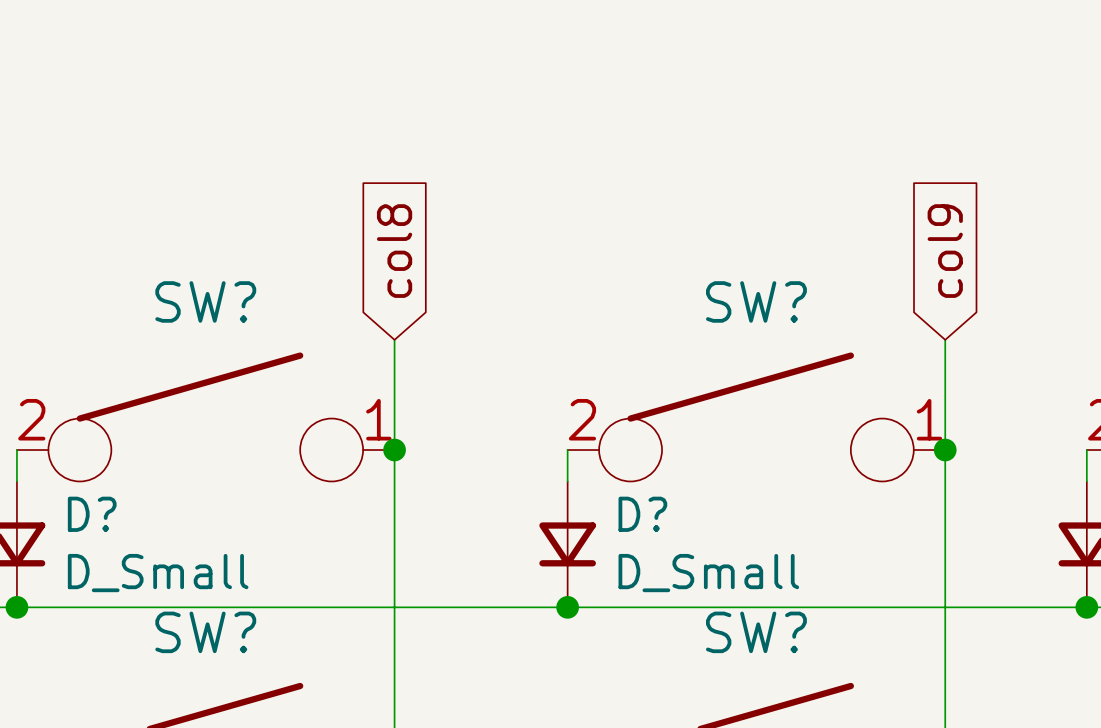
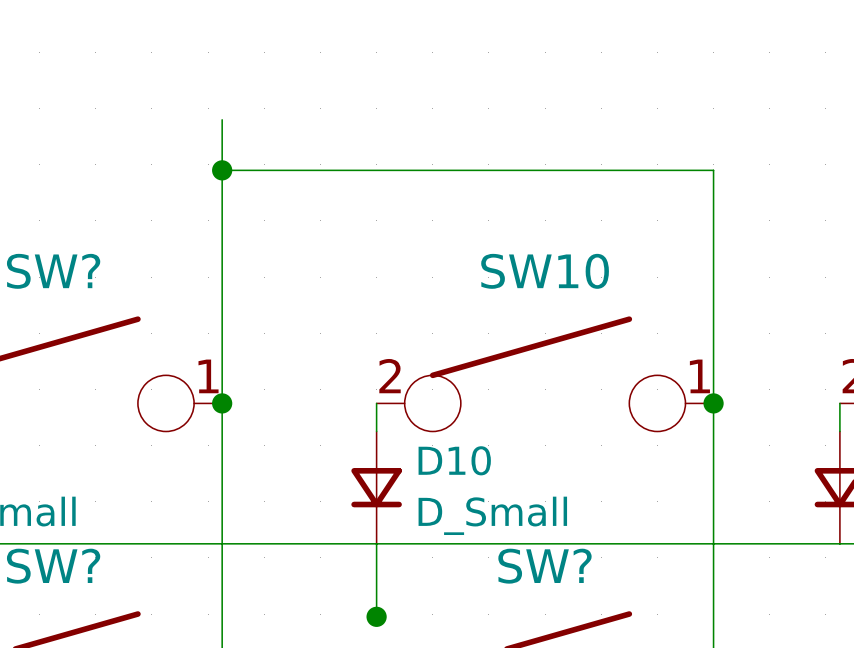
wire: none -> (222, 119) (222, 305)
wire: none -> (222, 170) (713, 170) (713, 305)
junction: none -> (222, 170)
global label: col8 (394, 251) -> none
global label: col9 (945, 251) -> none
SW? name: SW? (756, 301) -> SW10 (545, 271)
D? name: D? (642, 514) -> D10 (454, 460)
wire: none -> (376, 543) (376, 616)
junction position: (567, 607) -> (376, 616)
junction: (1086, 607) -> none

